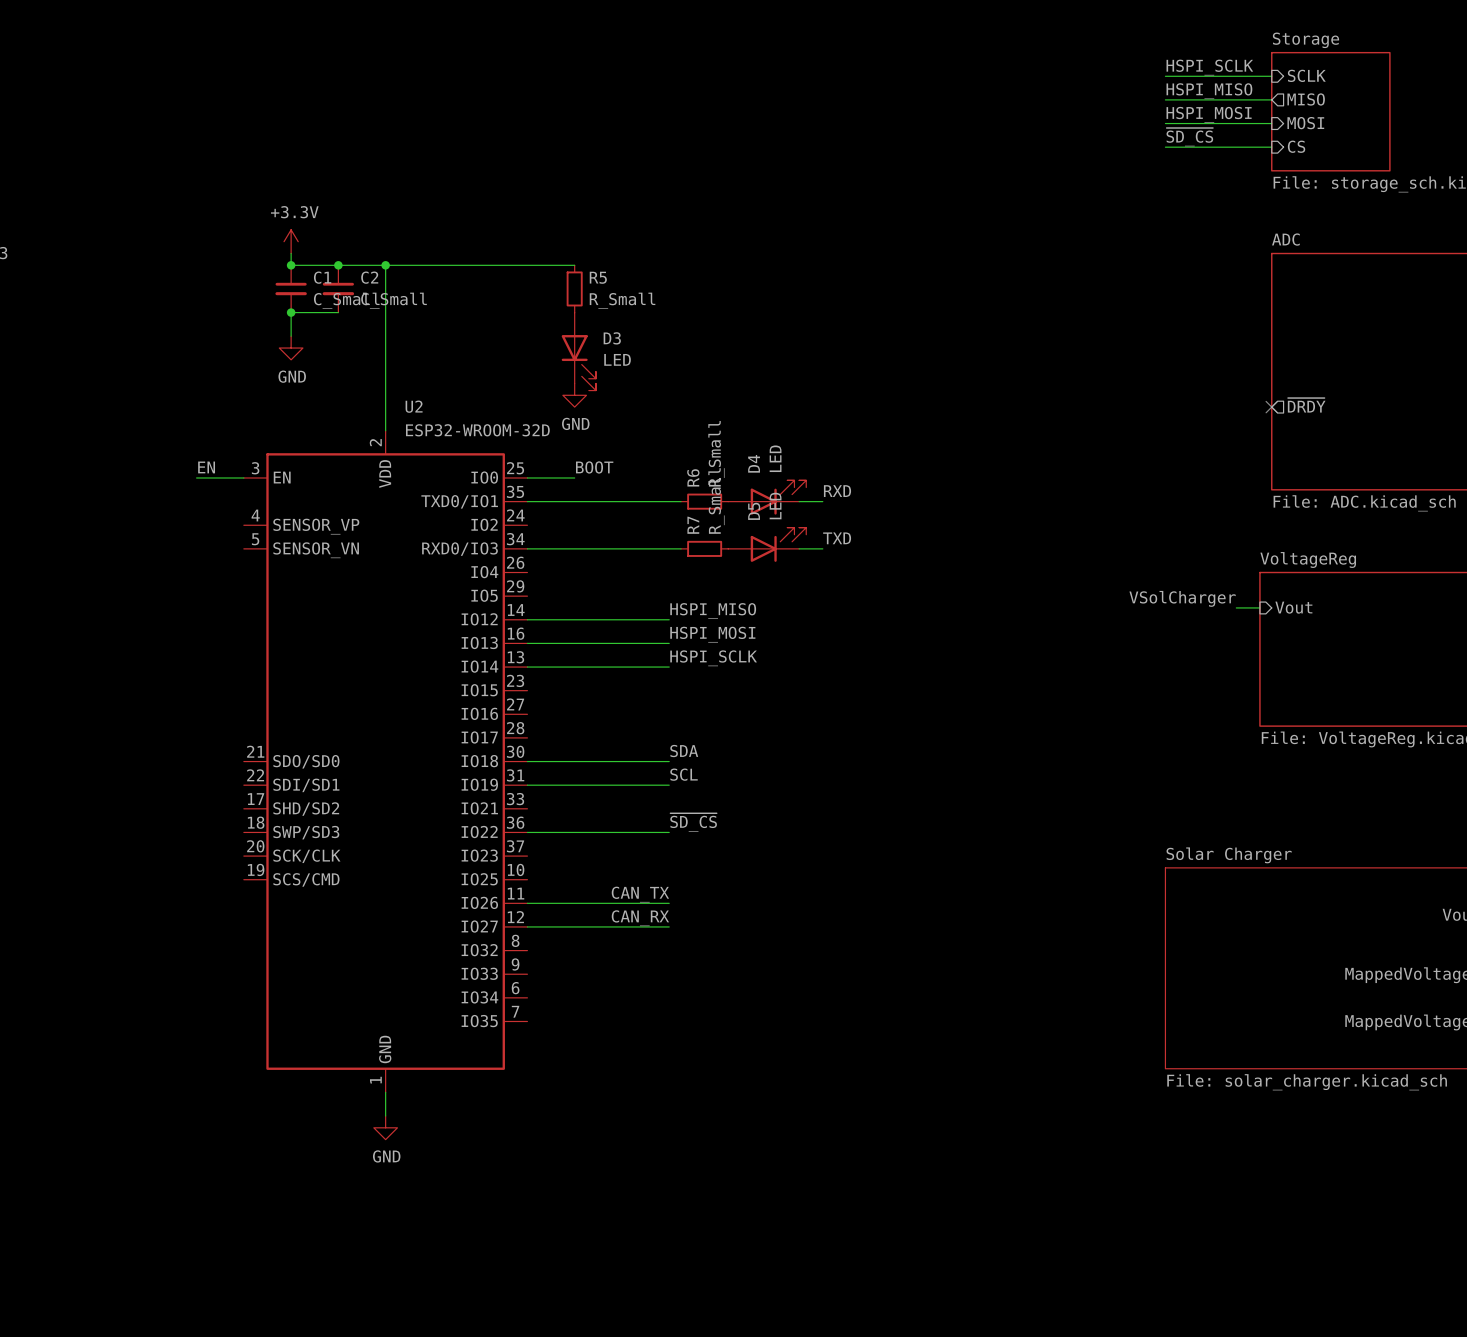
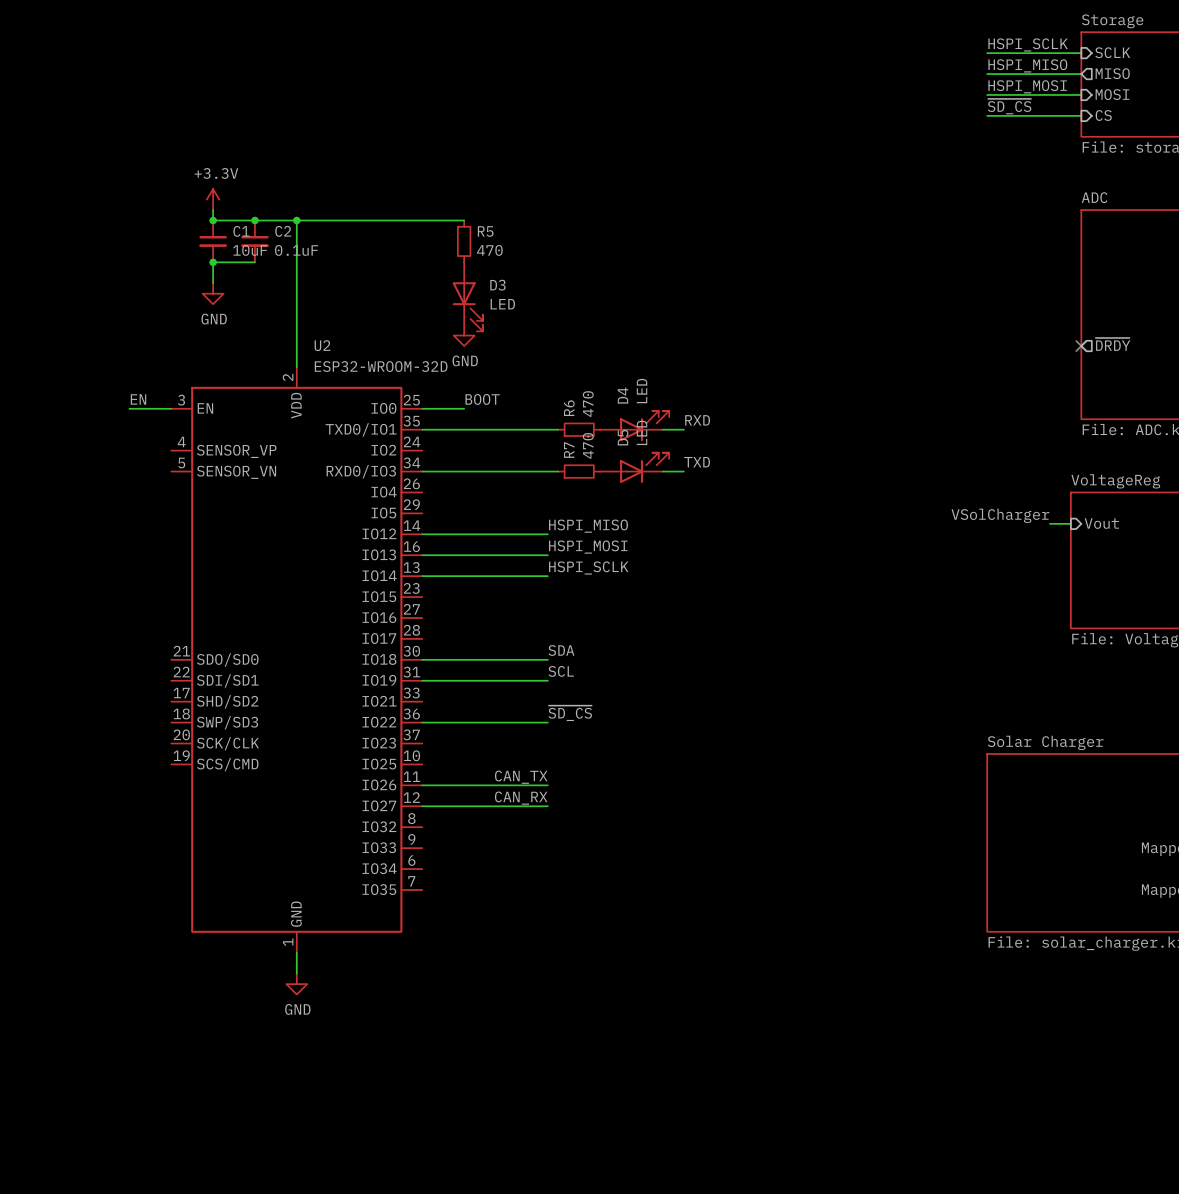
C1 value: C_Small (346, 300) -> 10uF (250, 250)
C2 value: C_Small (394, 300) -> 0.1uF (296, 250)
R5 value: R_Small (622, 300) -> 470 (489, 250)
R6 value: R_Small (716, 453) -> 470 (588, 404)
R7 value: R_Small (716, 501) -> 470 (588, 445)

